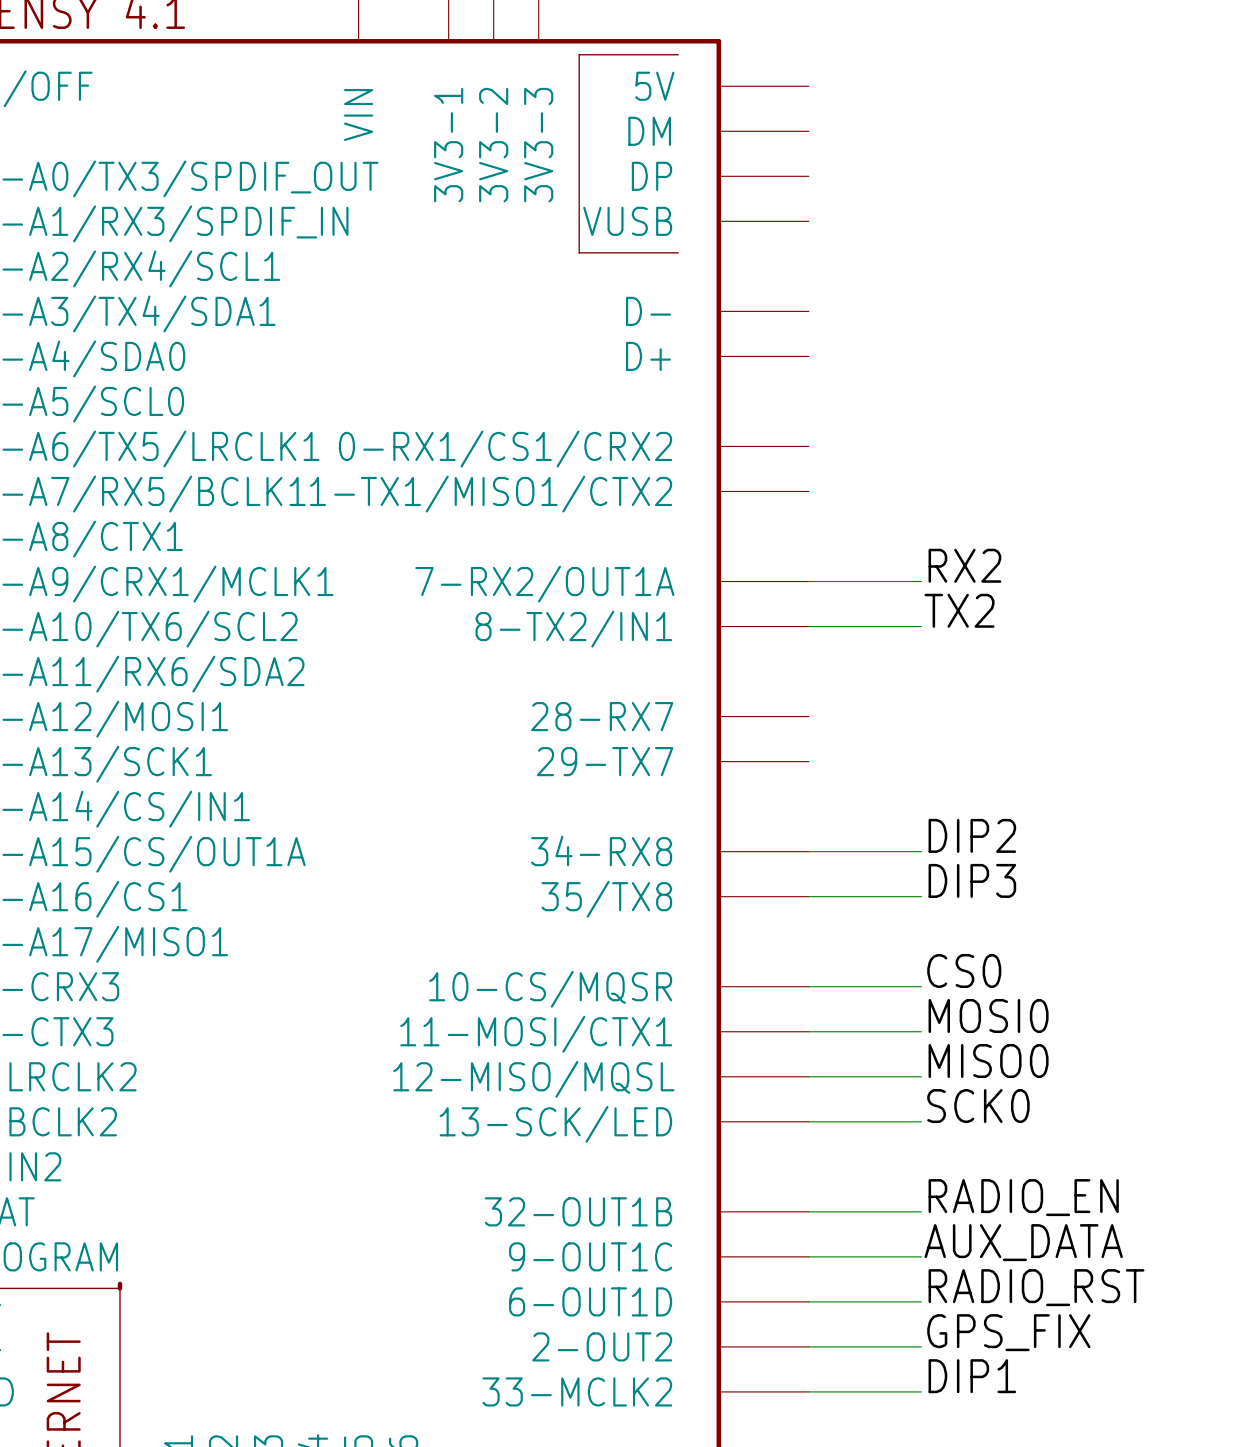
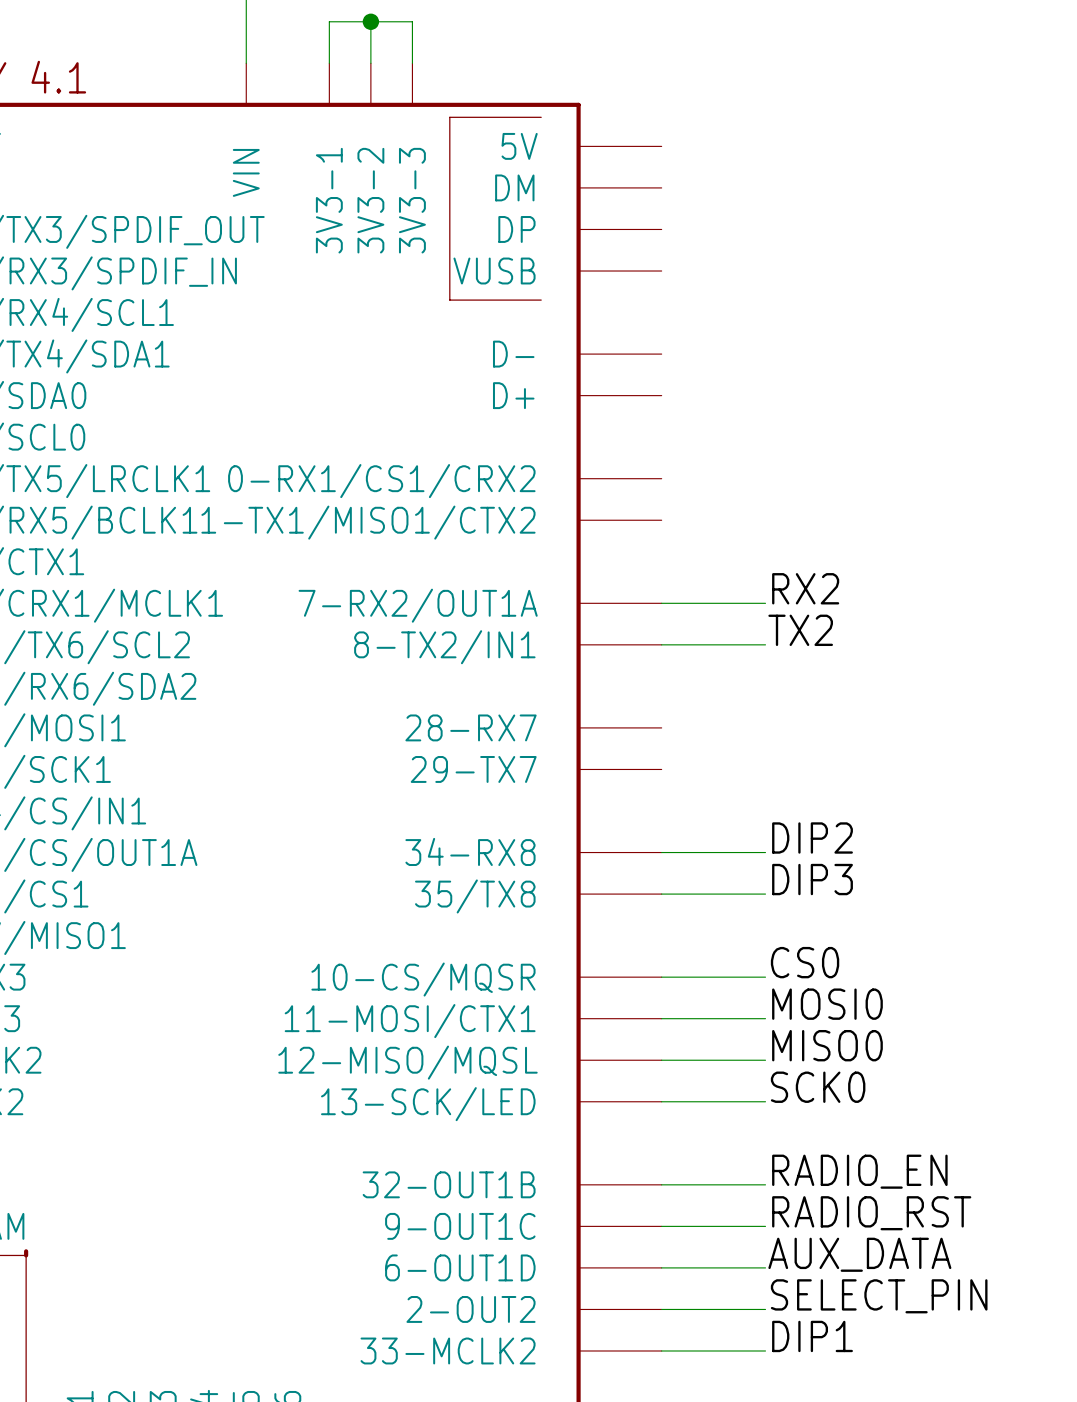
label: AUX_DATA (1023, 1242) -> RADIO_RST (871, 1213)
label: RADIO_RST (1036, 1287) -> AUX_DATA (859, 1254)
label: GPS_FIX (1008, 1332) -> SELECT_PIN (879, 1296)

